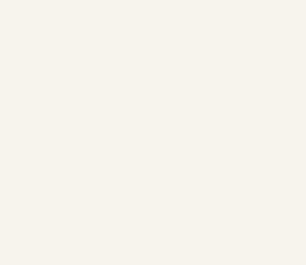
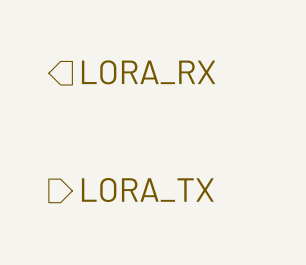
hierarchical label: none -> LORA_RX (148, 72)
hierarchical label: none -> LORA_TX (147, 190)

